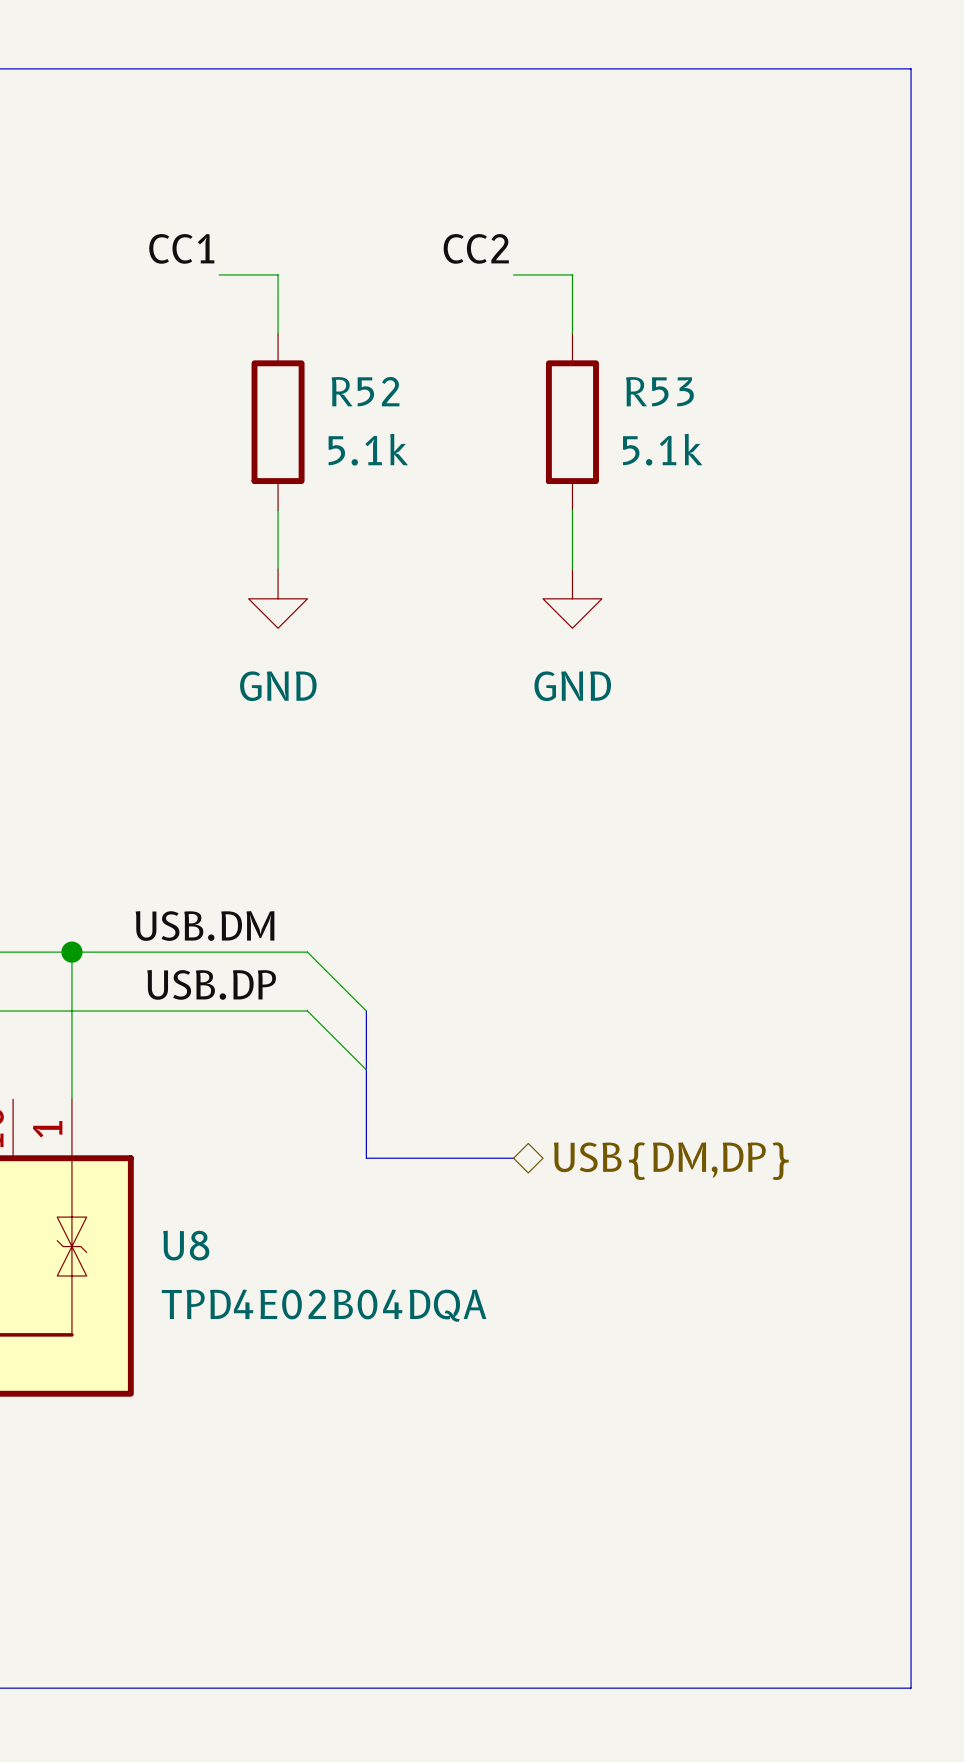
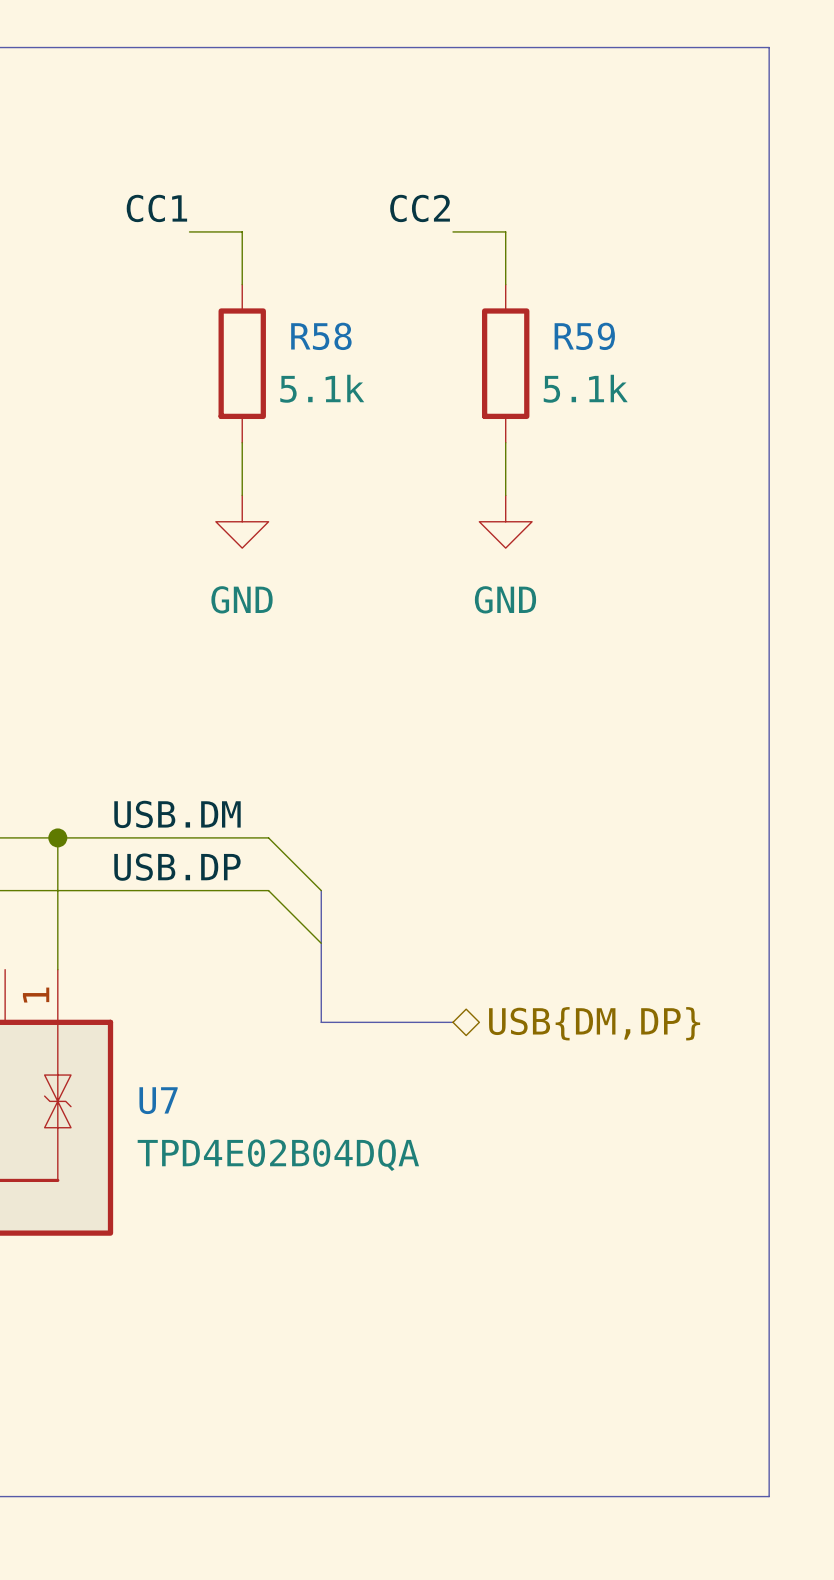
line: (866, 68) (911, 68) (911, 1688) (866, 1688) -> (769, 47) (769, 1496)
R52 name: R52 (365, 391) -> R58 (321, 336)
R53 name: R53 (659, 391) -> R59 (584, 336)
U8 name: U8 (186, 1245) -> U7 (158, 1100)

